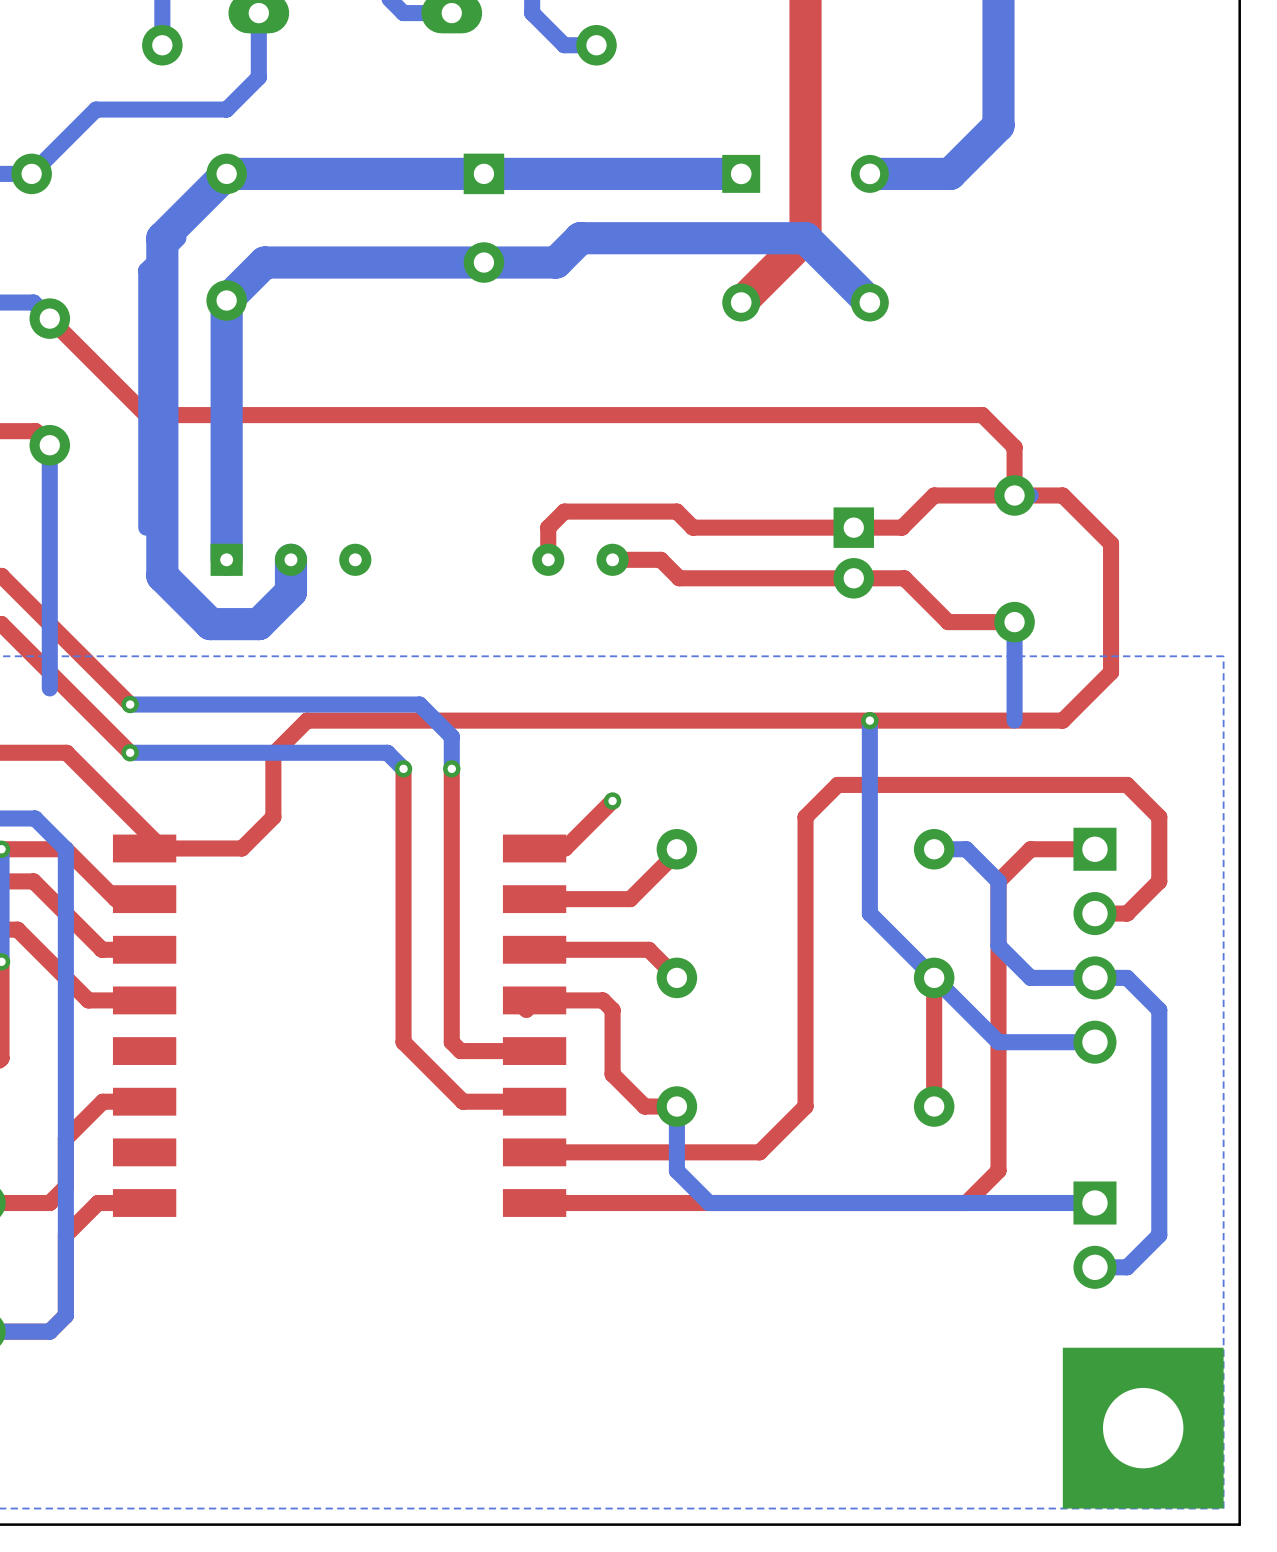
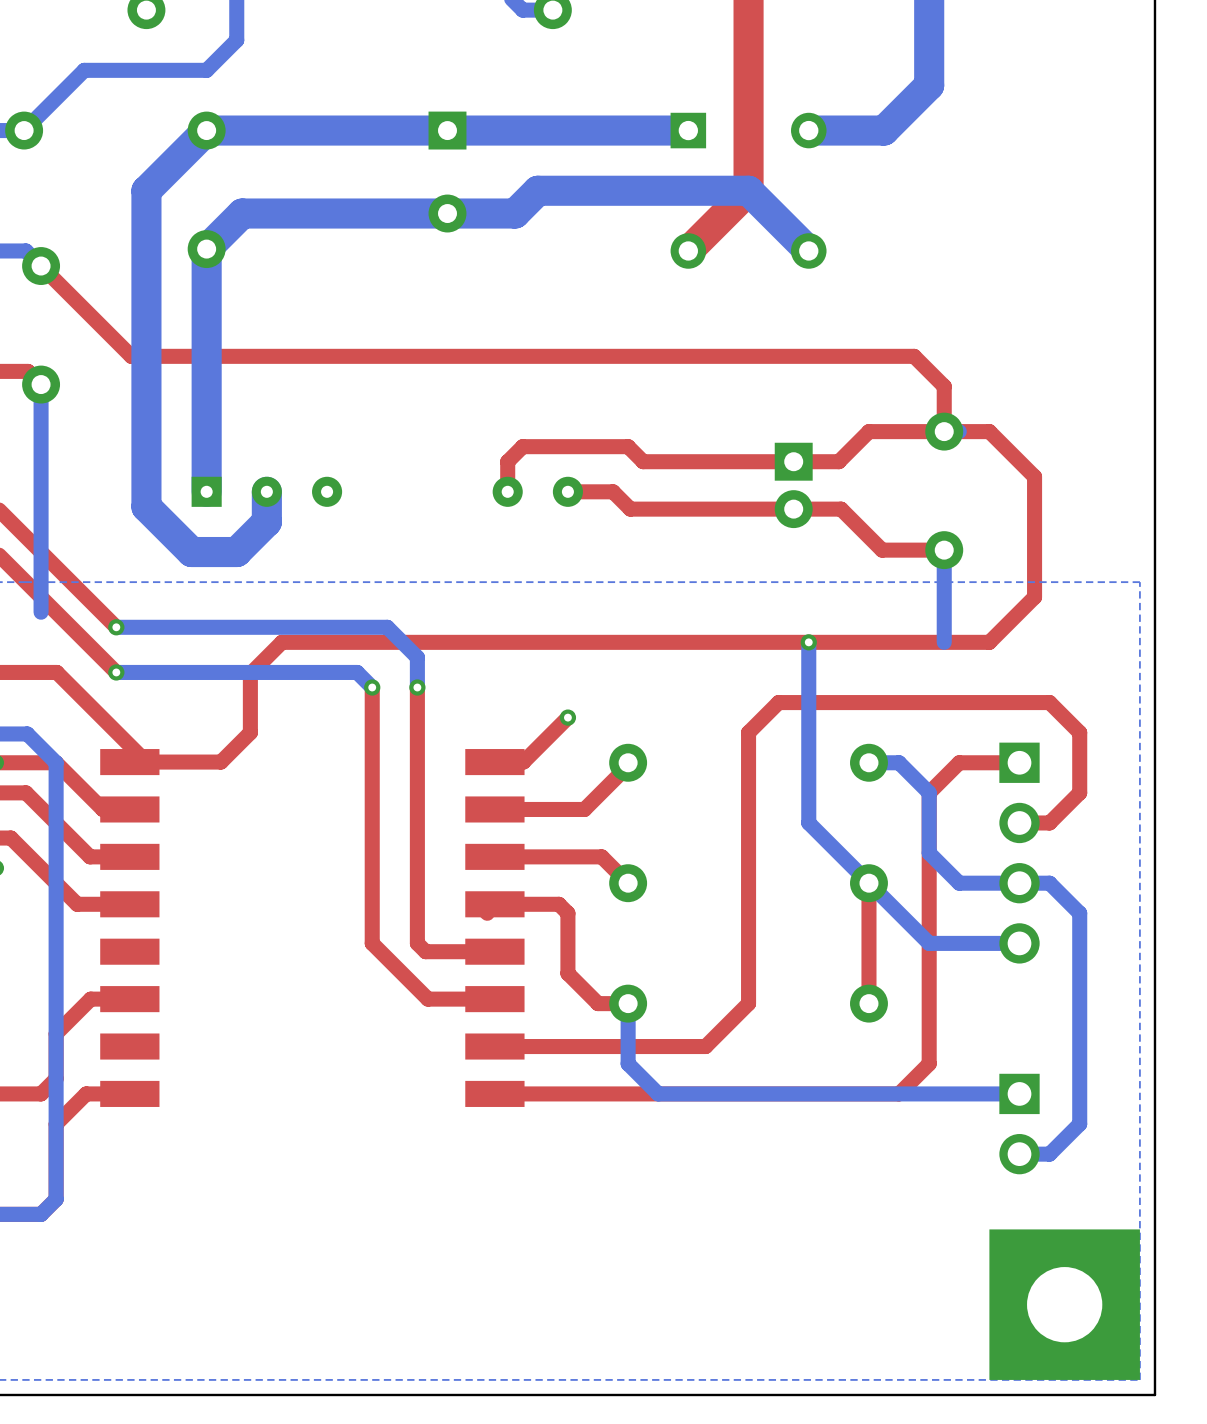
bottom track: (178, 238) (146, 270) (146, 527) -> none

